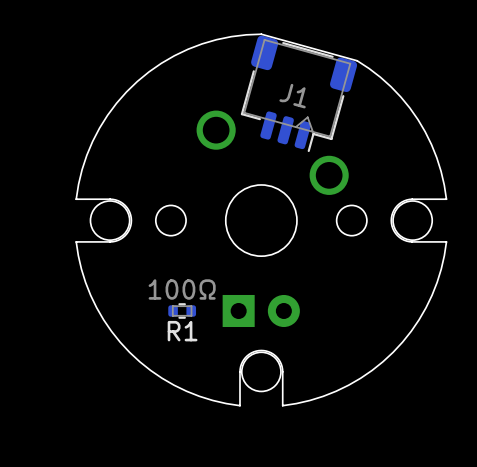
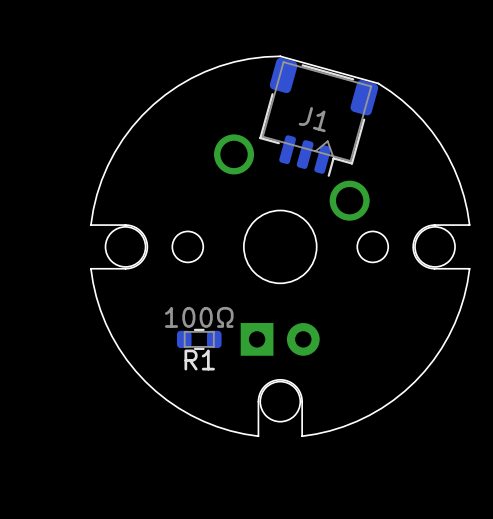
R1 footprint: [168, 303, 197, 319] -> [176, 328, 222, 350]

